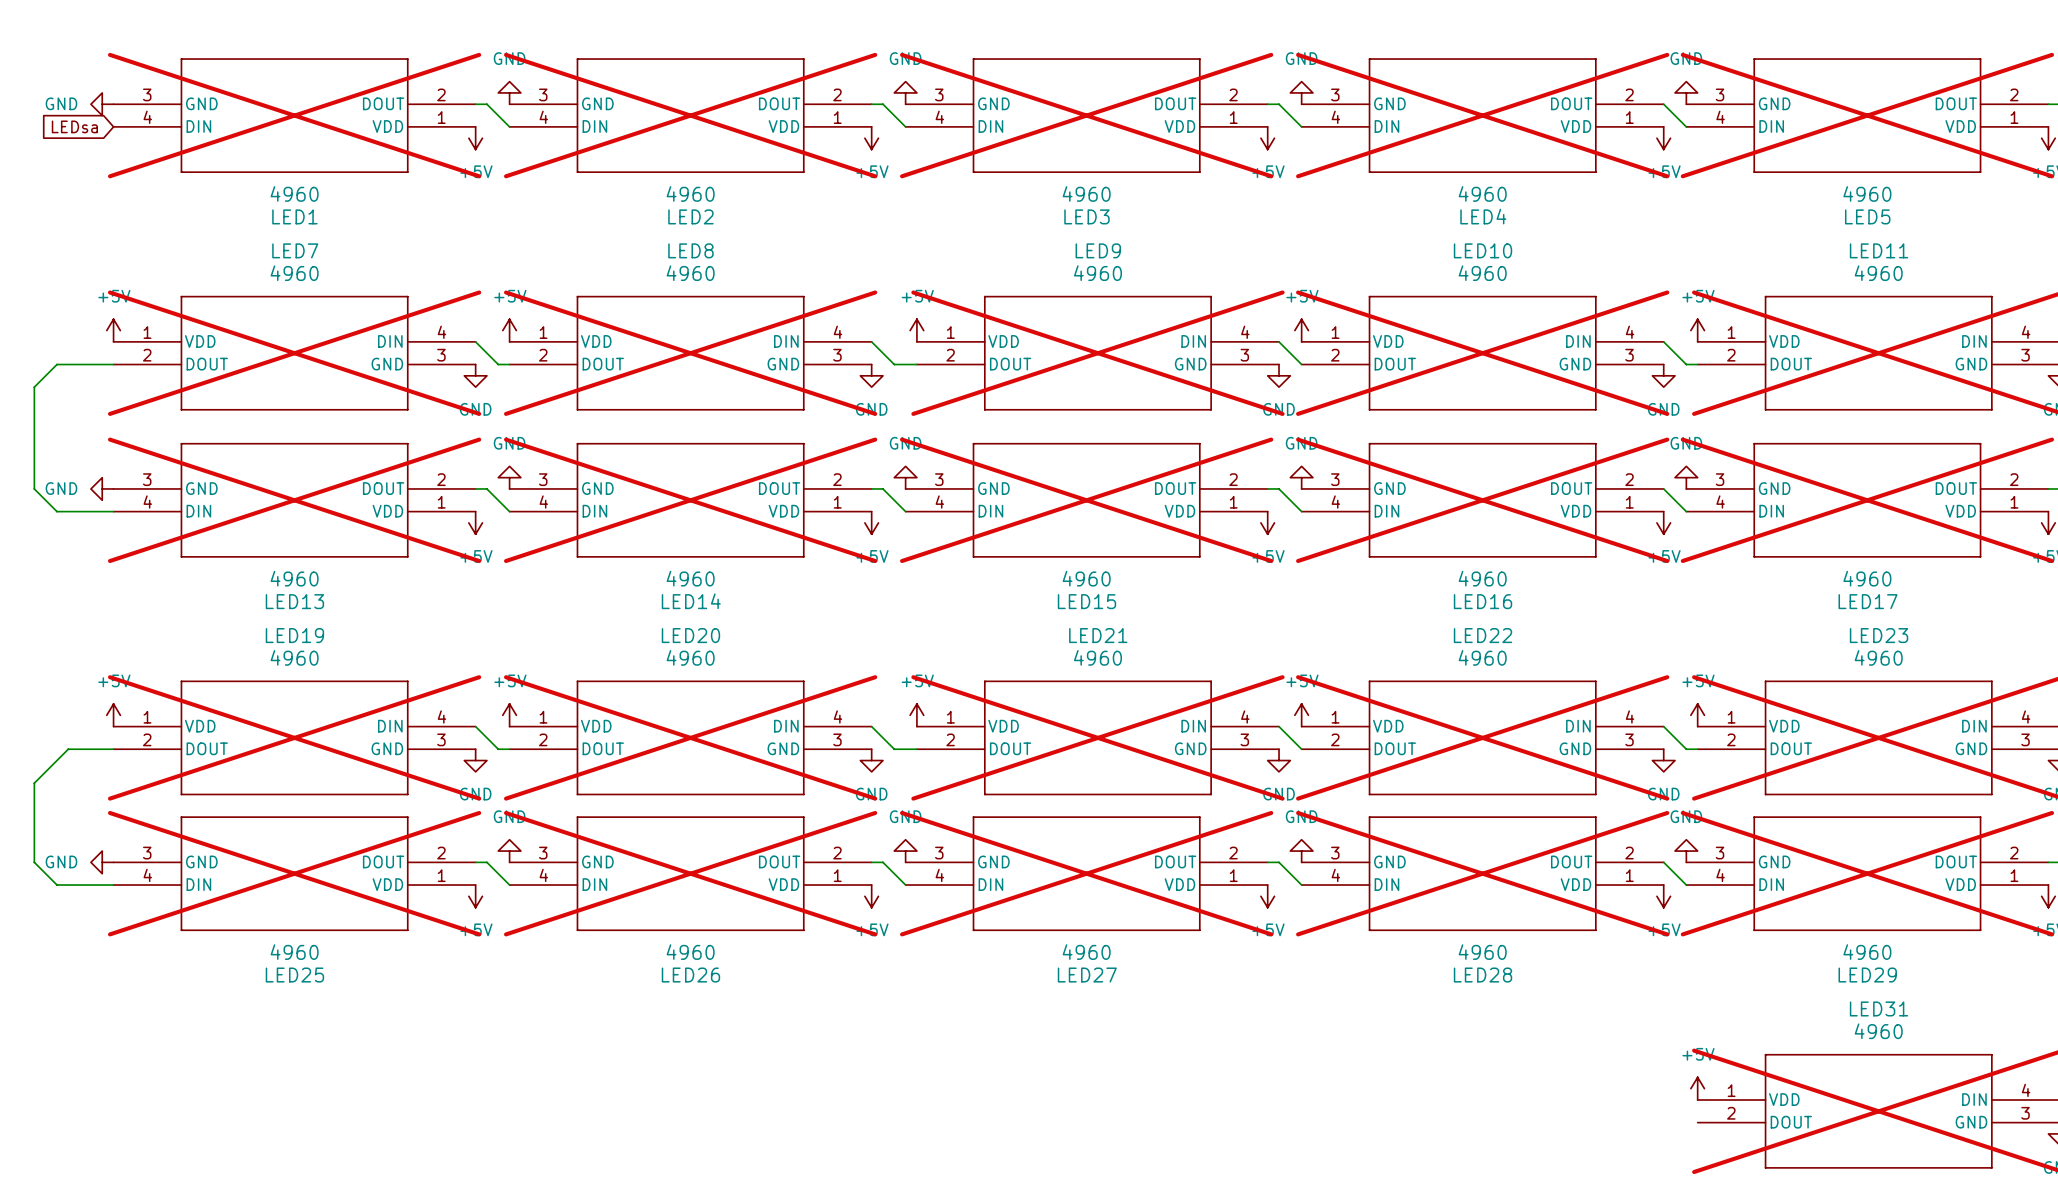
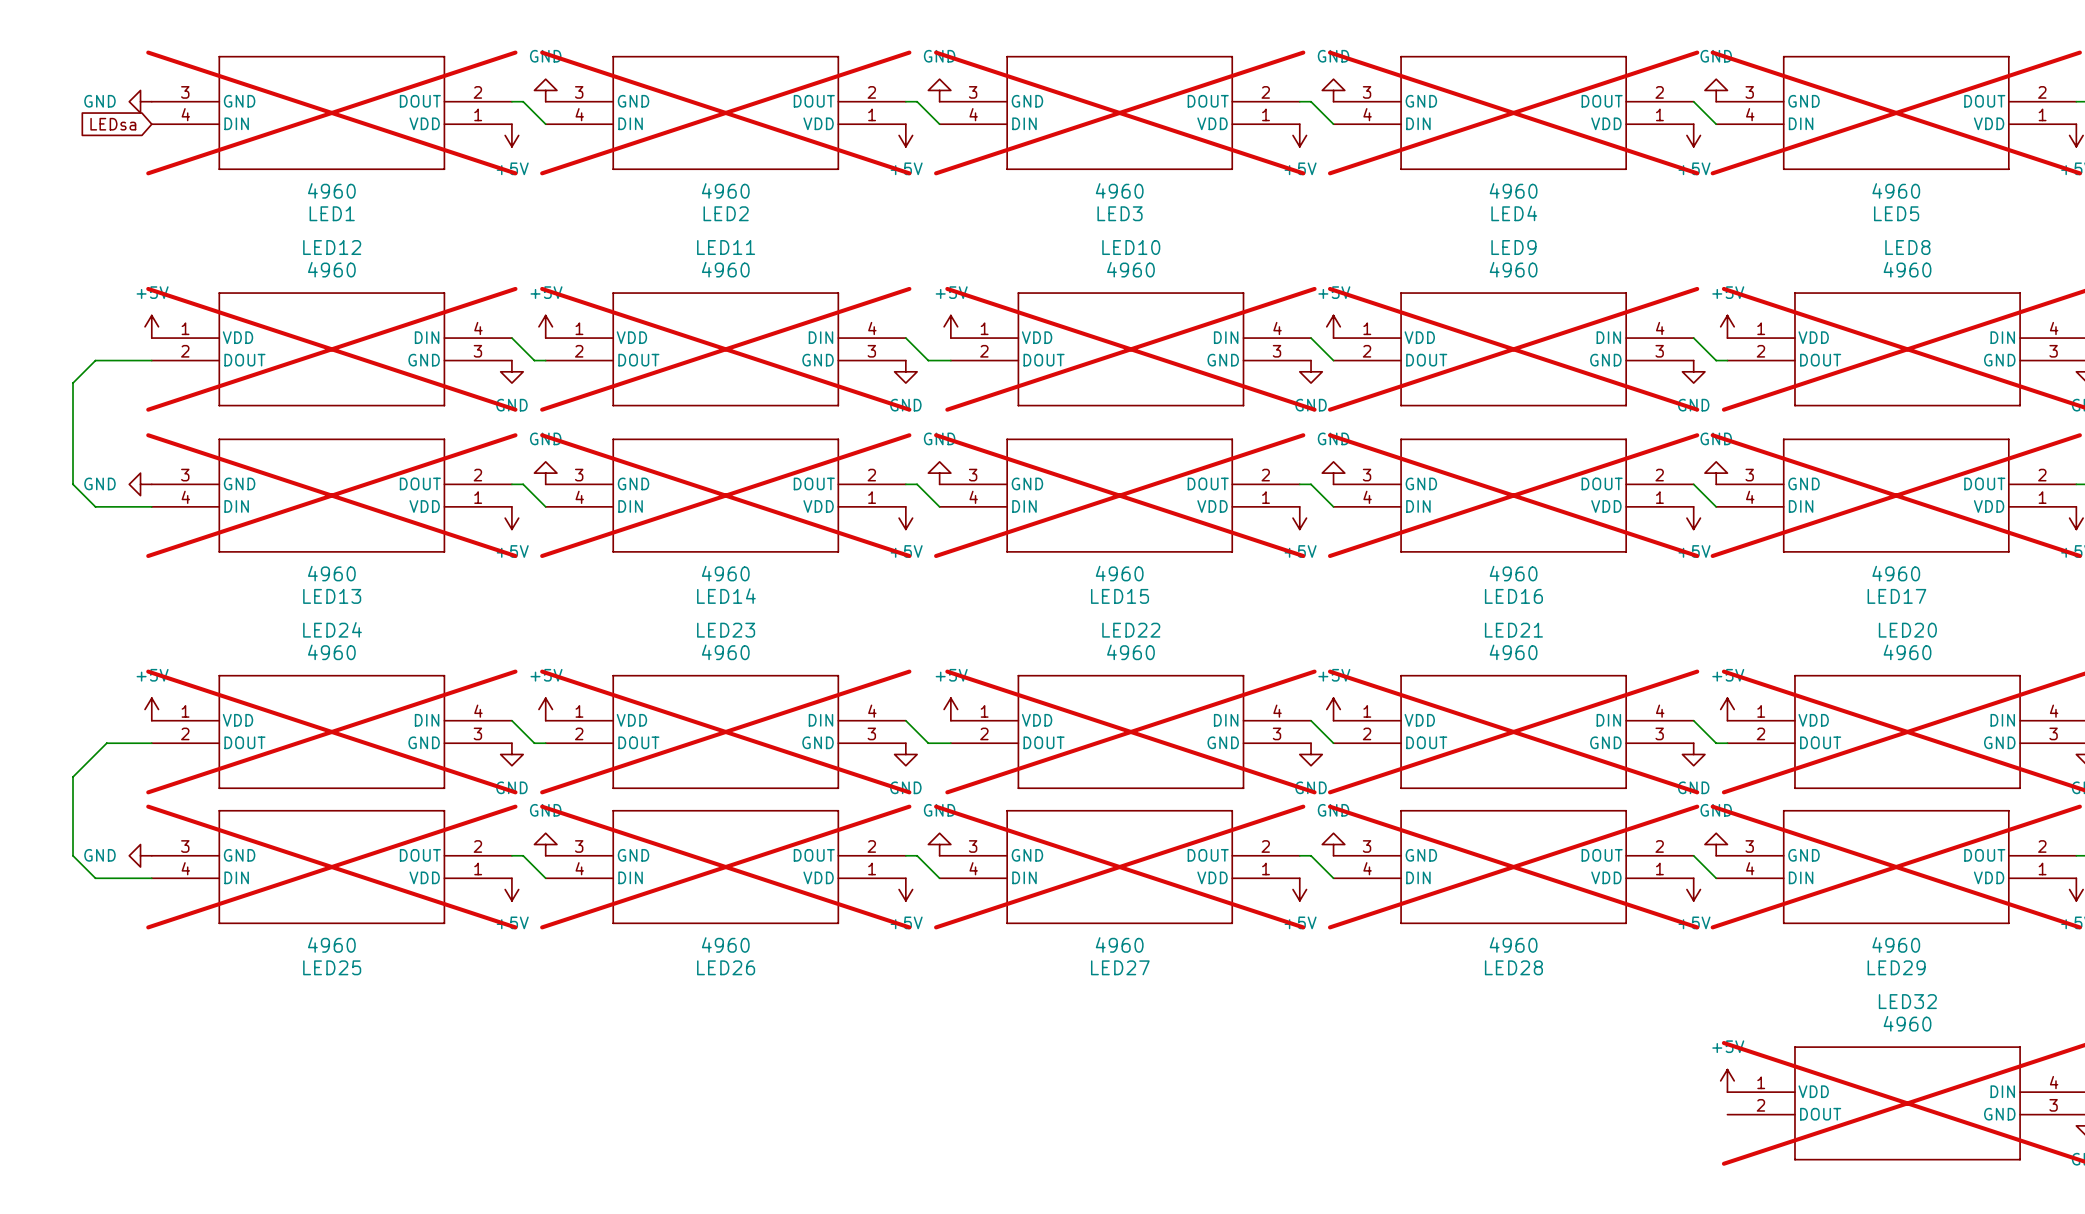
LED7 name: LED7 (295, 250) -> LED12 (332, 247)
LED8 name: LED8 (690, 250) -> LED11 (726, 247)
LED9 name: LED9 (1098, 250) -> LED10 (1131, 247)
LED10 name: LED10 (1483, 250) -> LED9 (1513, 247)
LED11 name: LED11 (1879, 250) -> LED8 (1907, 247)
LED19 name: LED19 (294, 635) -> LED24 (332, 629)
LED20 name: LED20 (690, 635) -> LED23 (726, 630)
LED21 name: LED21 (1098, 635) -> LED22 (1131, 630)
LED22 name: LED22 (1483, 635) -> LED21 (1513, 630)
LED23 name: LED23 (1879, 635) -> LED20 (1907, 630)
LED31 name: LED31 (1879, 1008) -> LED32 (1907, 1001)

